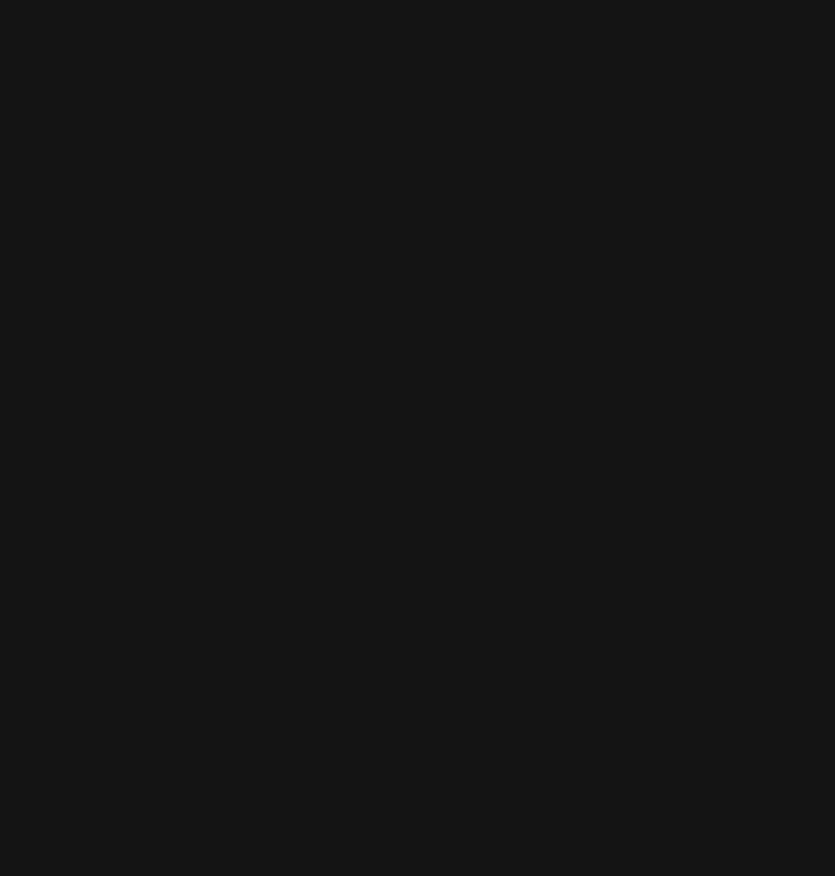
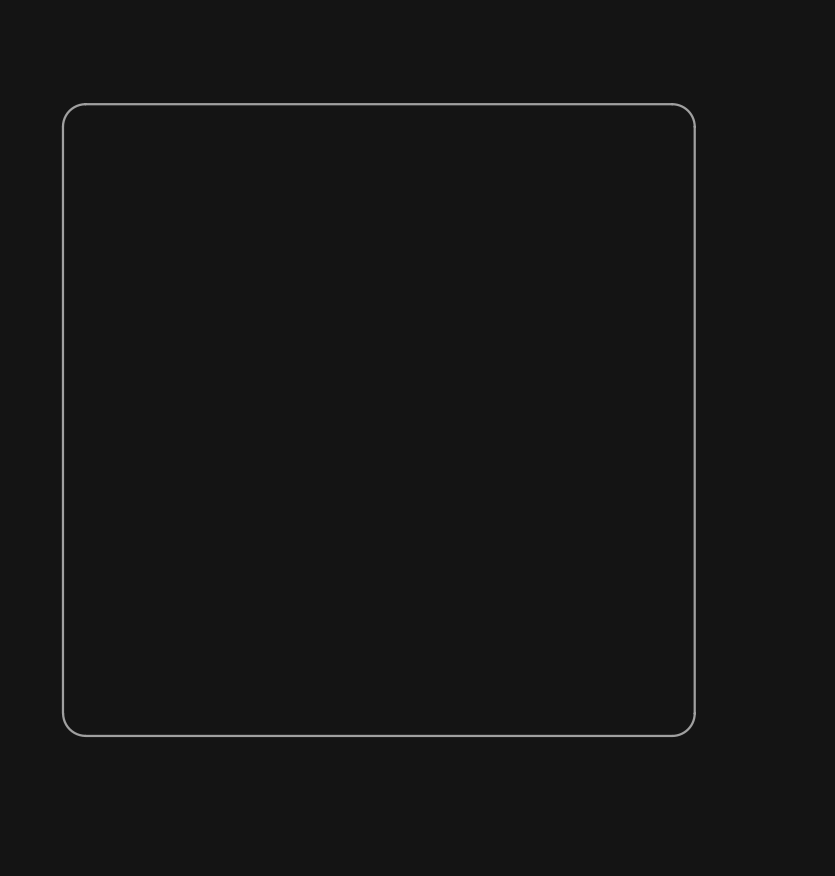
drawing: none -> [61, 103, 696, 738]

